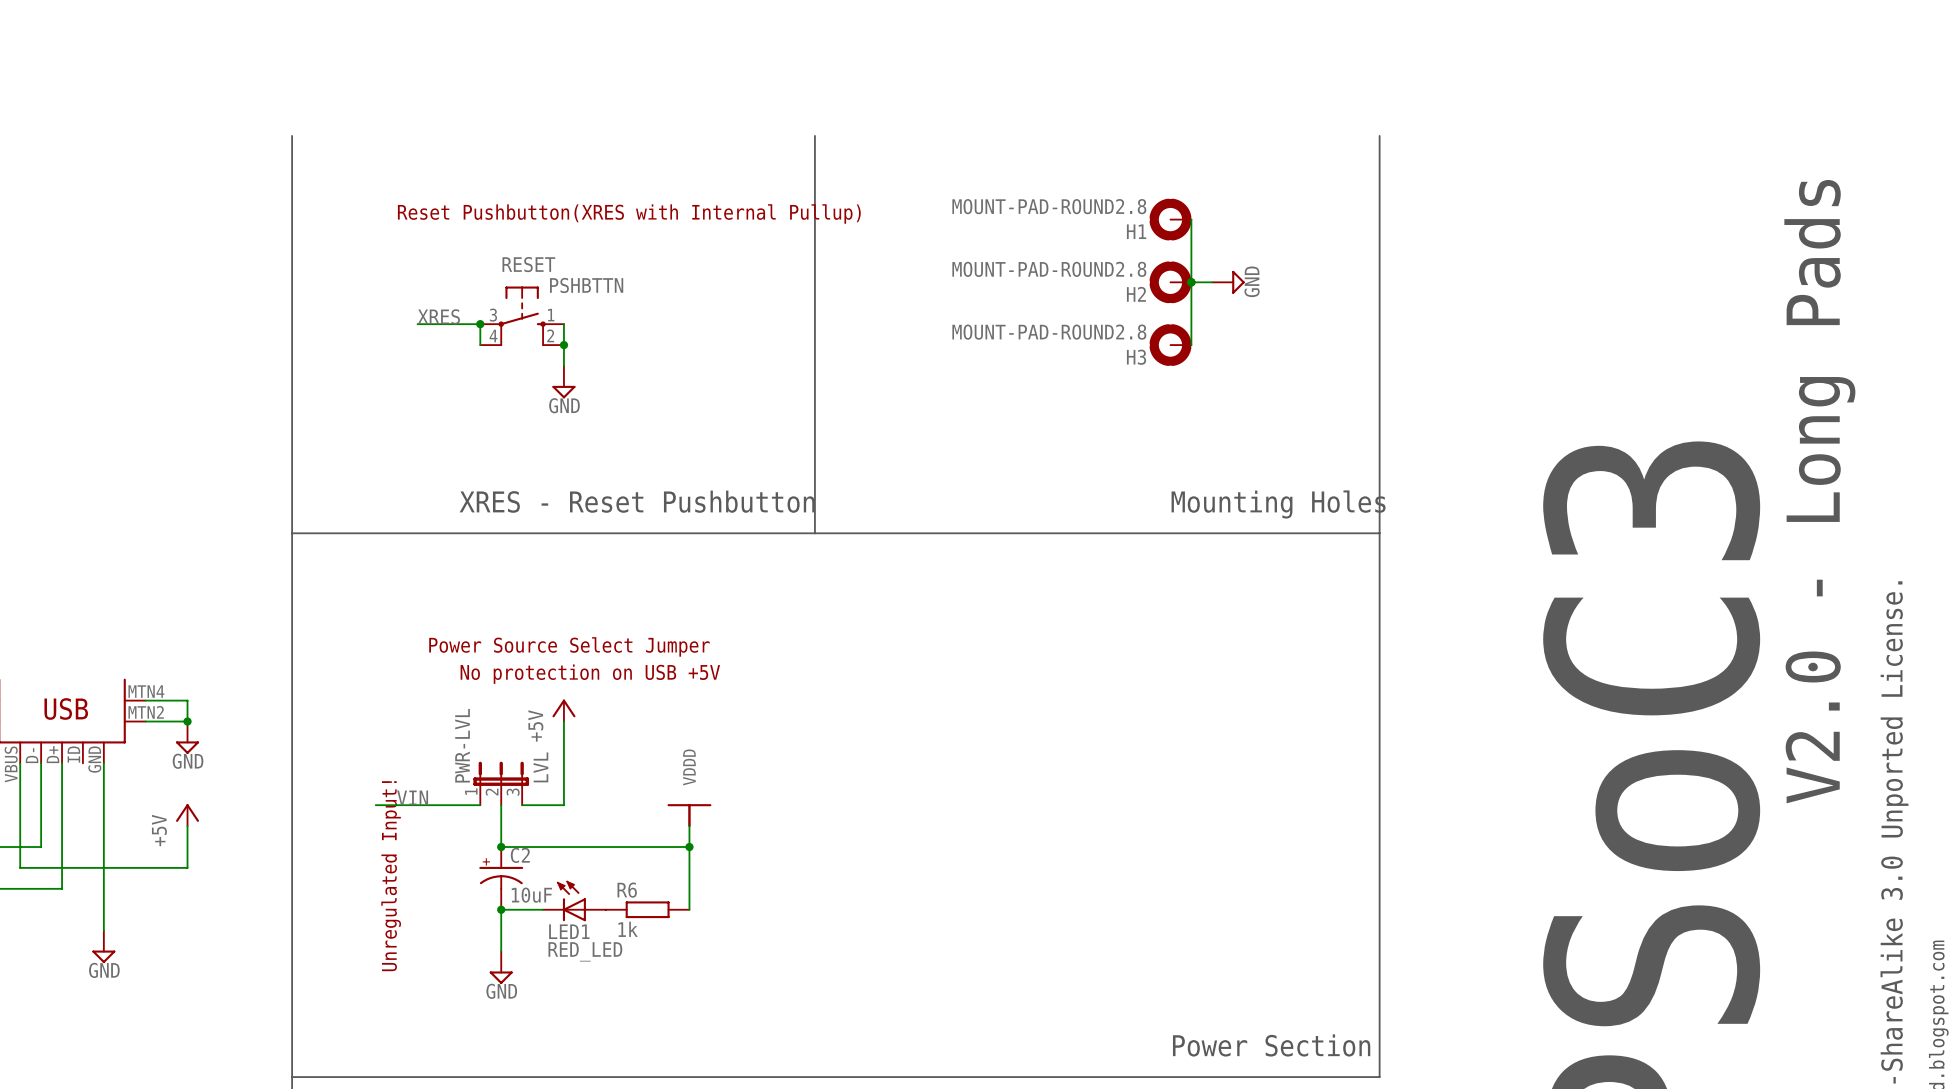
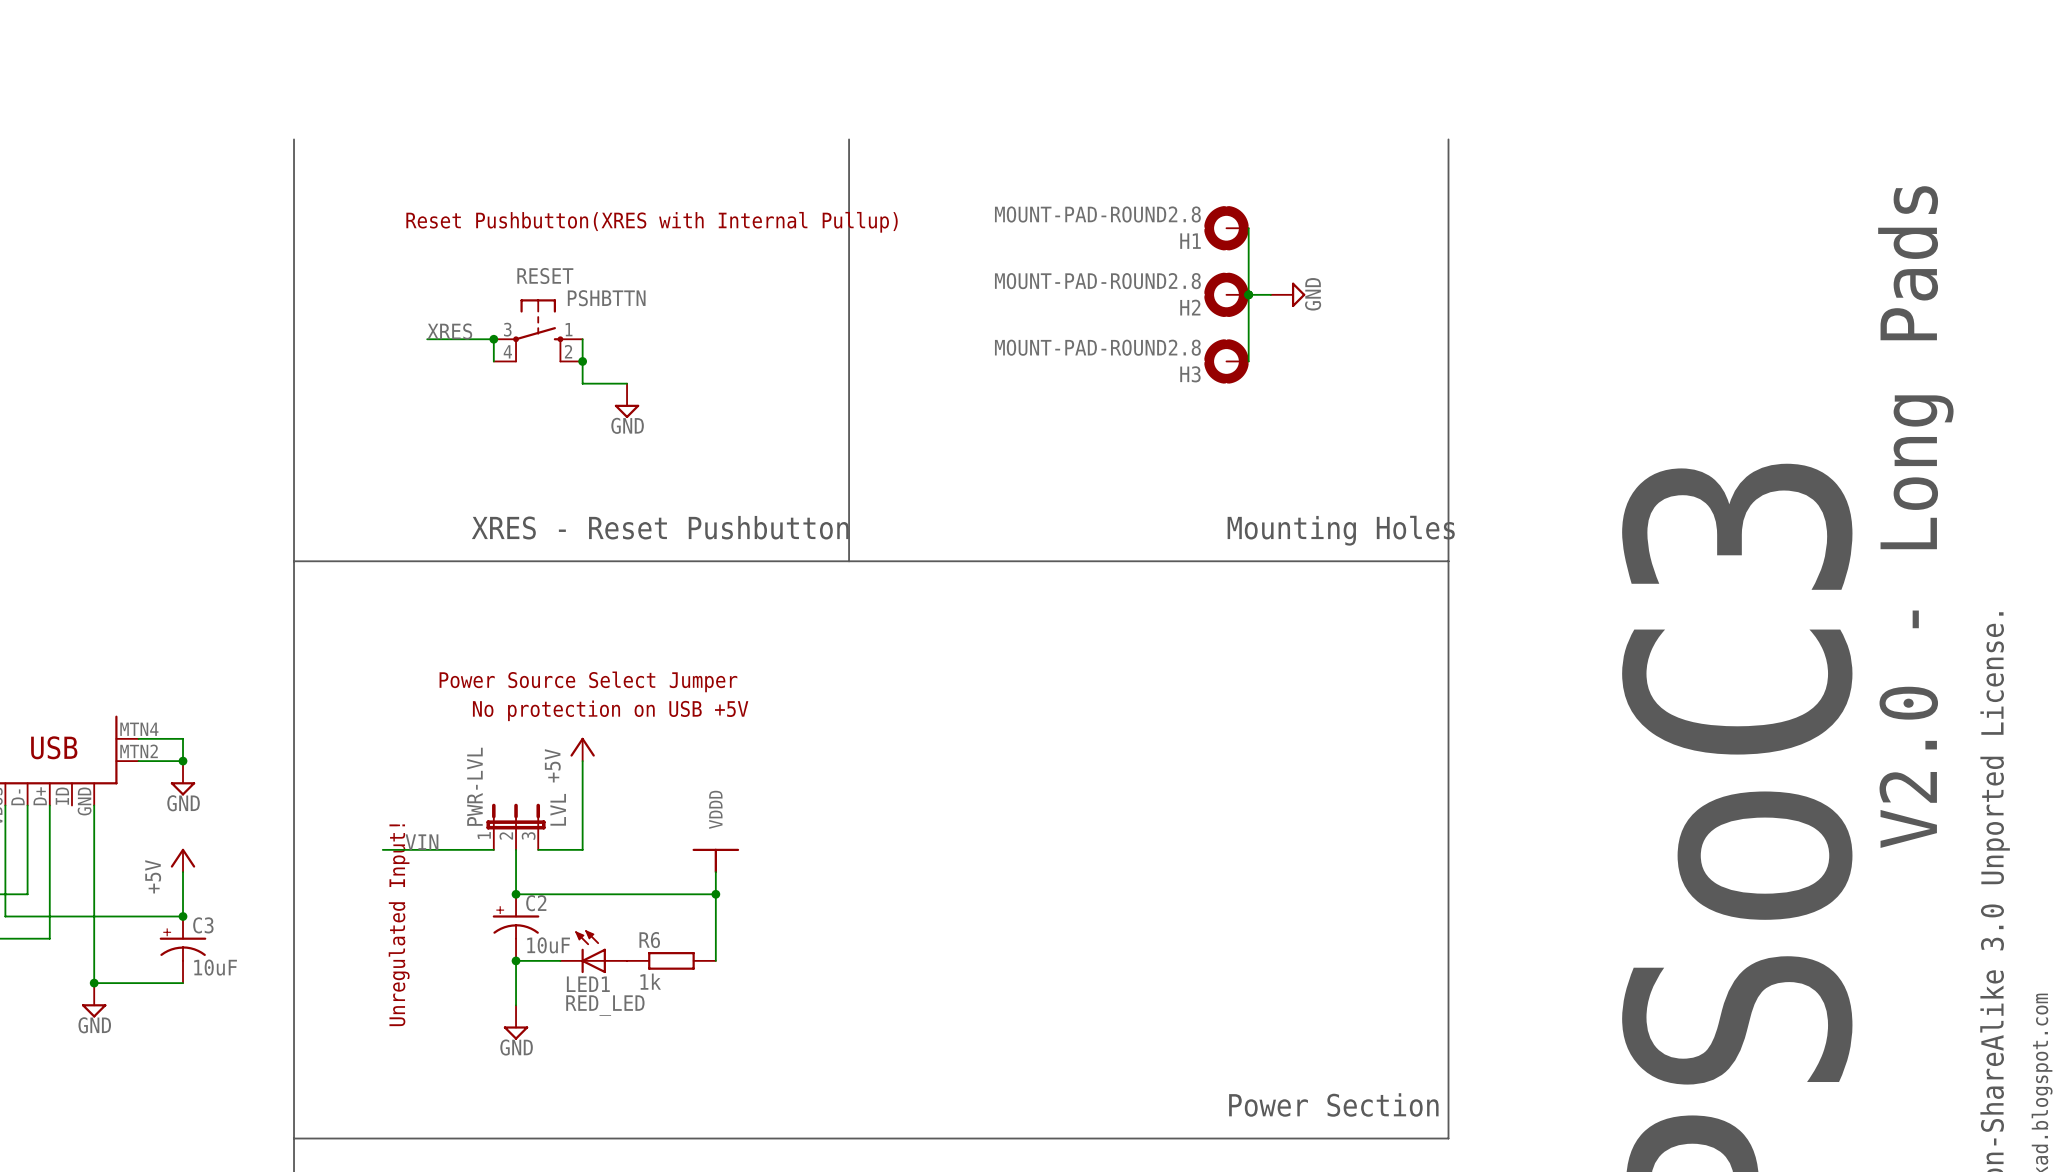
wire: none -> (582, 383) (627, 383)
power symbol position: GND (563, 382) -> GND (627, 400)
junction: none -> (183, 916)
C3: none -> 10uF (183, 949)
wire: none -> (94, 983) (183, 983)
junction: none -> (94, 983)

